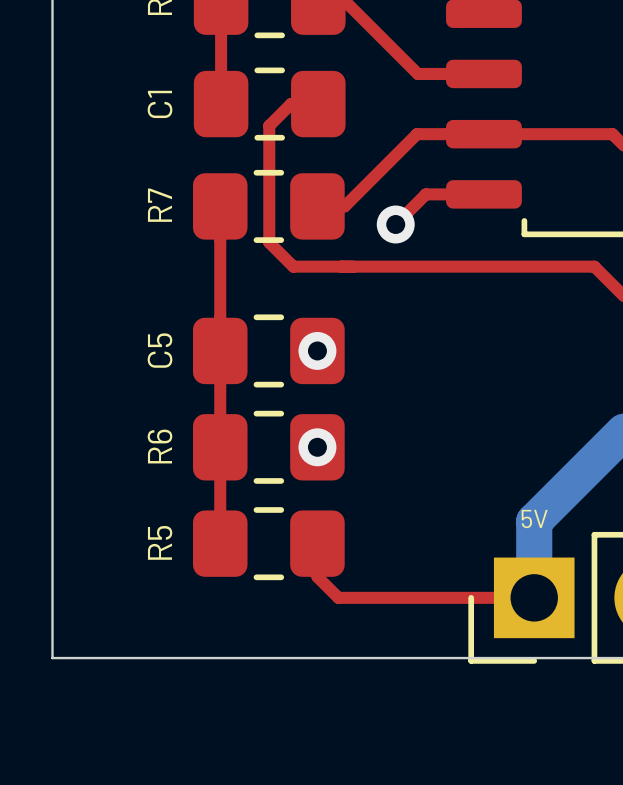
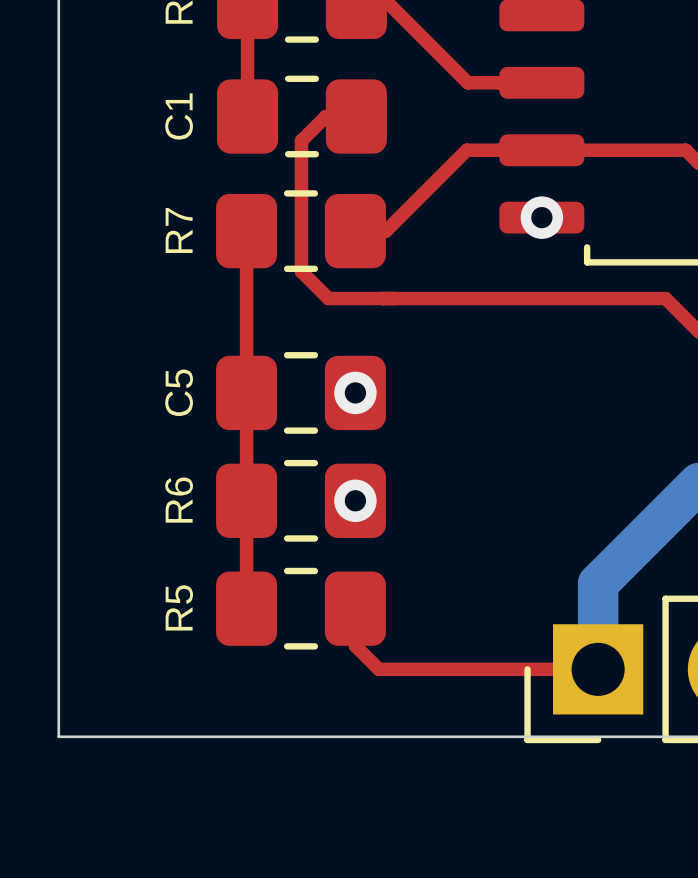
top track: (483, 194) (425, 194) (395, 224) -> none
via position: (395, 224) -> (541, 217)
text: 5V (534, 518) -> none

